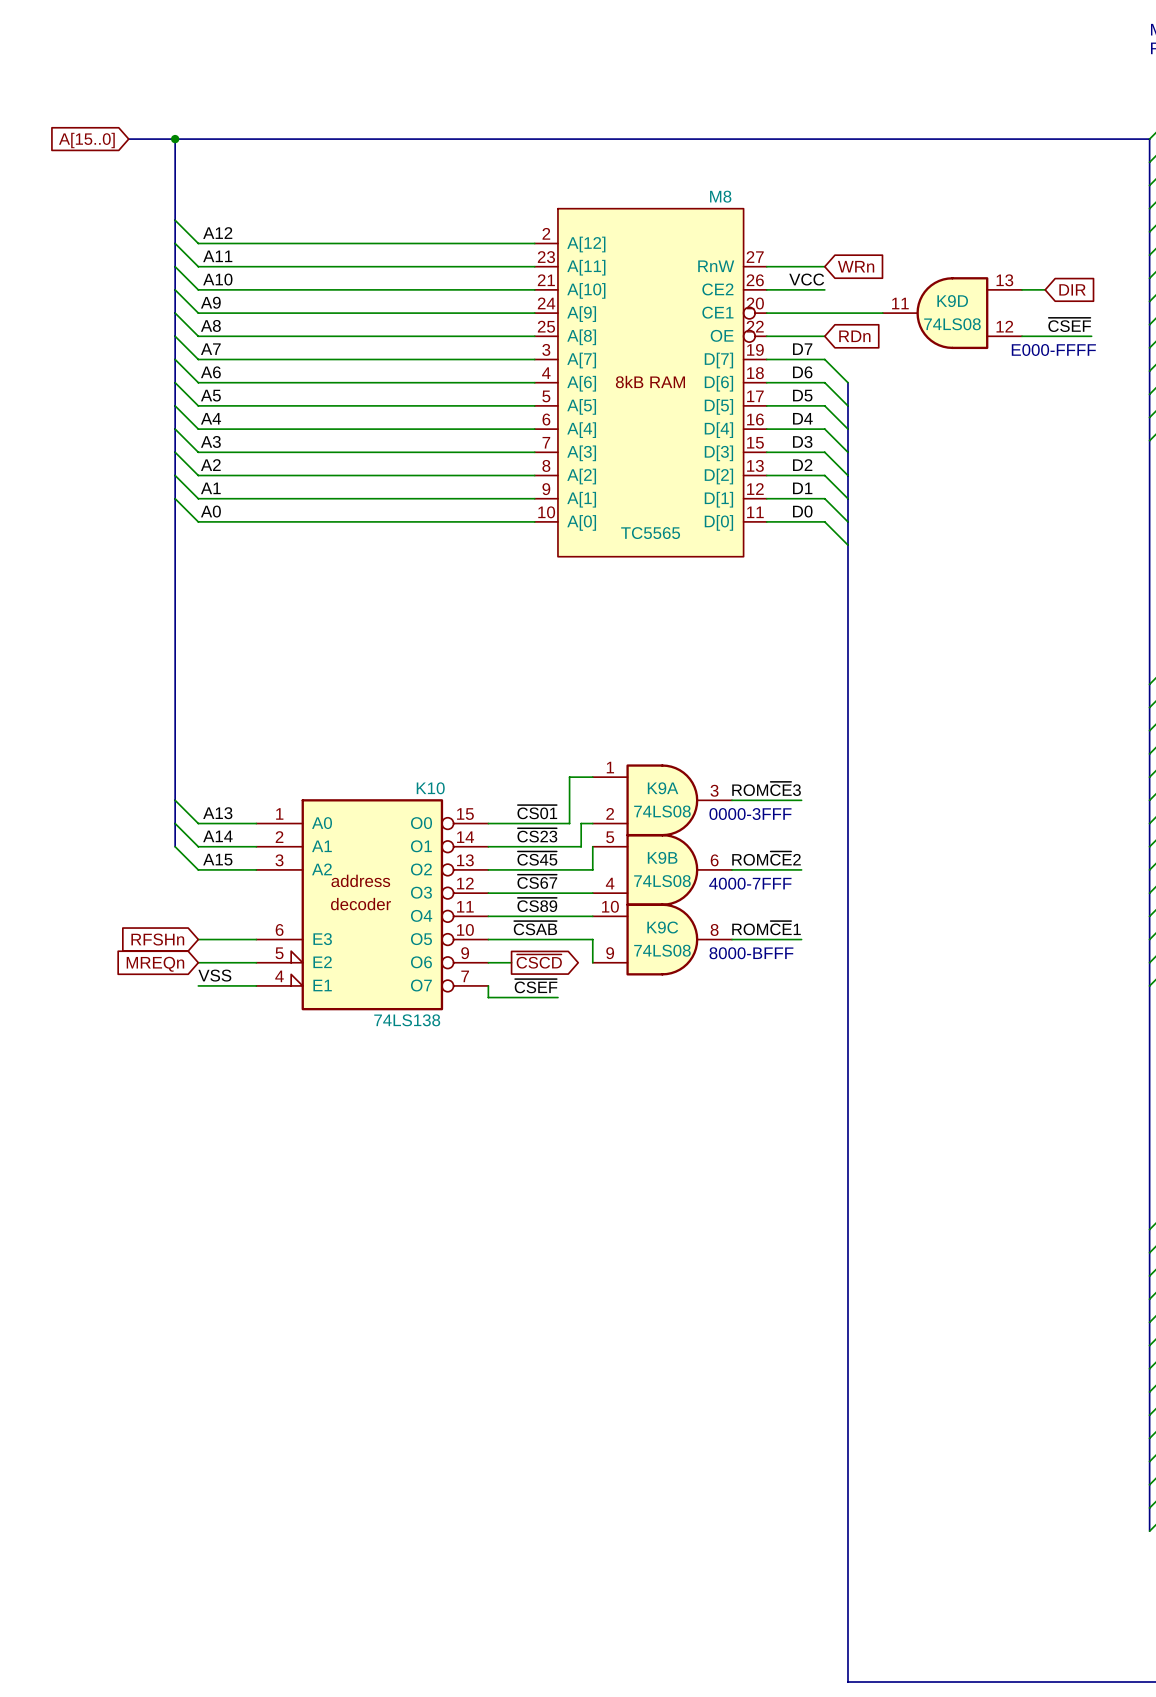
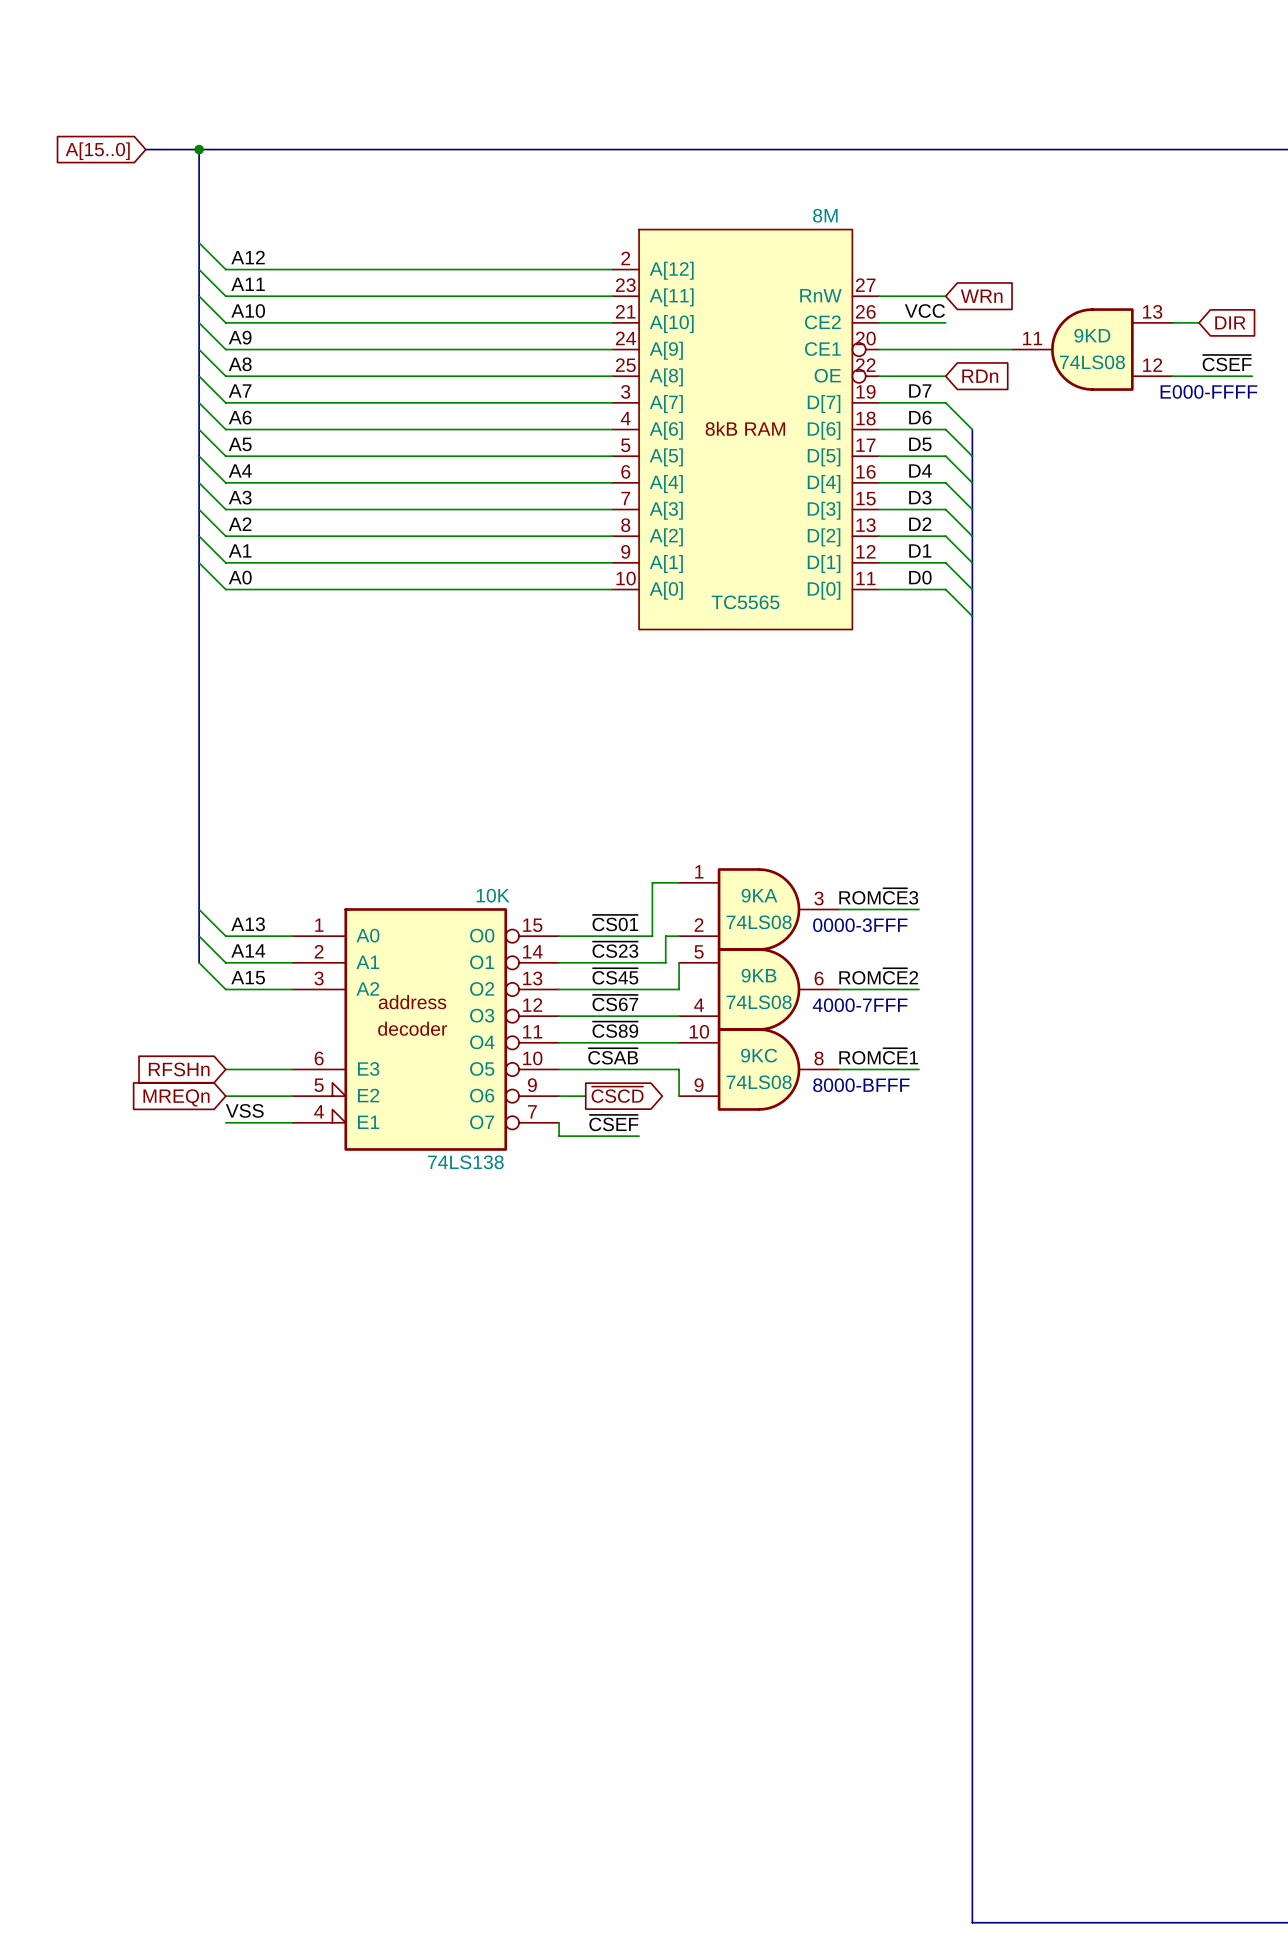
M8 name: M8 (720, 196) -> 8M (825, 215)
K9D name: K9D (952, 301) -> 9KD (1092, 335)
K10 name: K10 (430, 788) -> 10K (493, 895)
K9A name: K9A (663, 788) -> 9KA (759, 895)
K9B name: K9B (662, 857) -> 9KB (759, 975)
K9C name: K9C (662, 927) -> 9KC (759, 1055)

